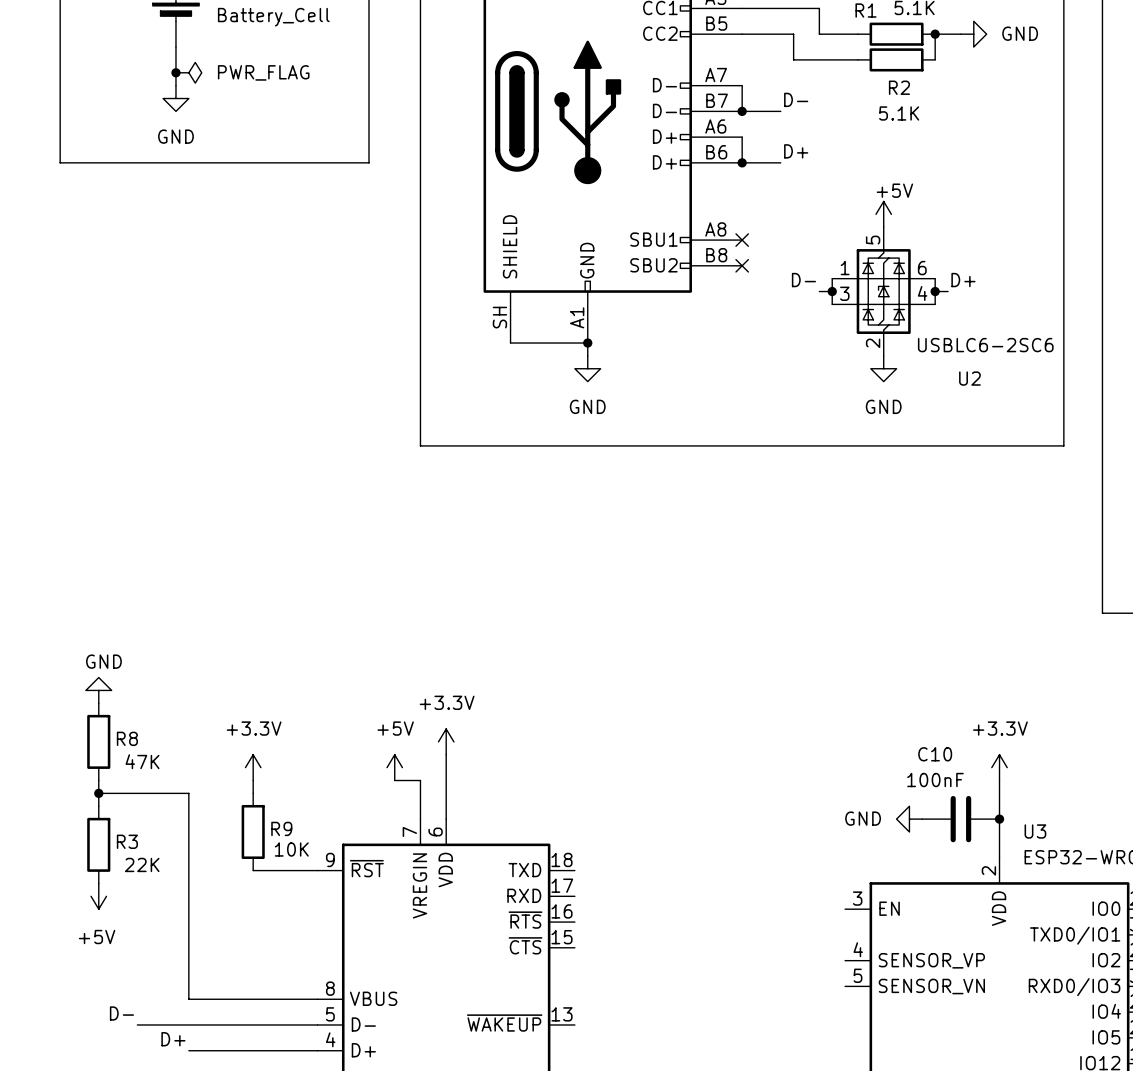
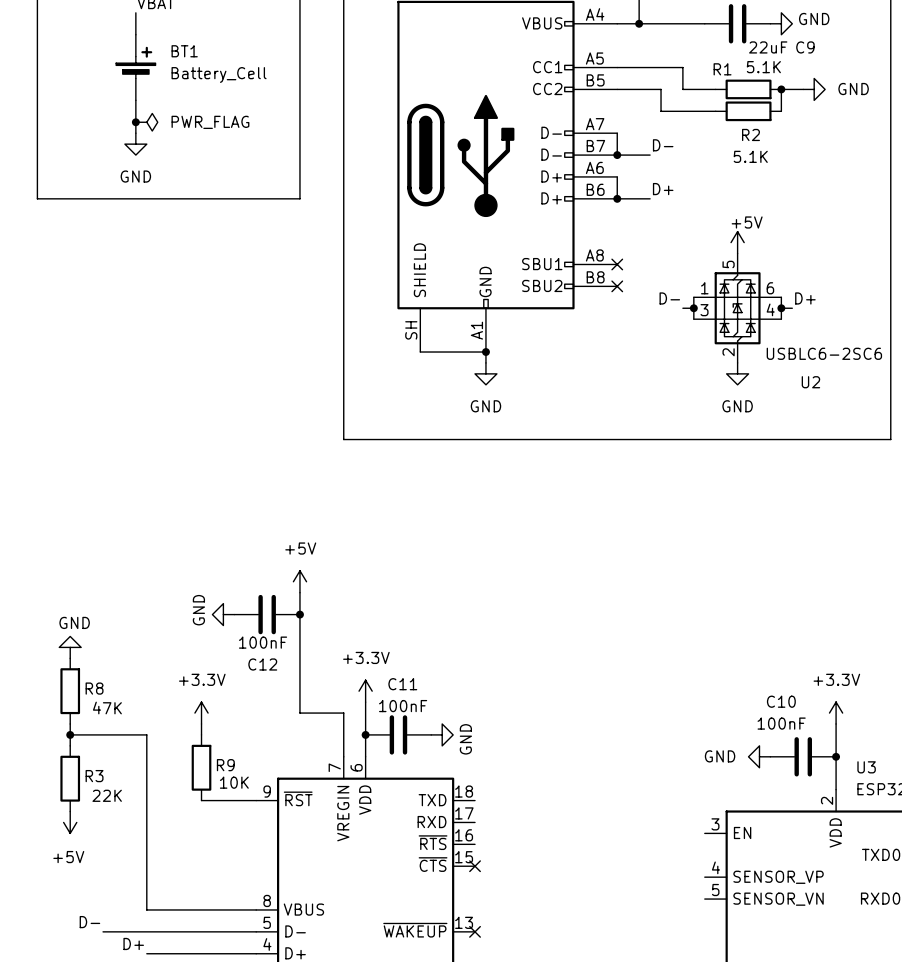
power symbol: none -> GND (223, 614)
C12: none -> 100nF (267, 614)
junction: none -> (299, 614)
power symbol position: +5V (394, 767) -> +5V (299, 581)
wire: (394, 780) (420, 780) -> (299, 592) (299, 713) (343, 713) (343, 723)
junction: none -> (365, 734)
C11: none -> 100nF (398, 734)
power symbol: none -> GND (442, 734)
no-connect mark: none -> (475, 866)
no-connect mark: none -> (475, 931)

